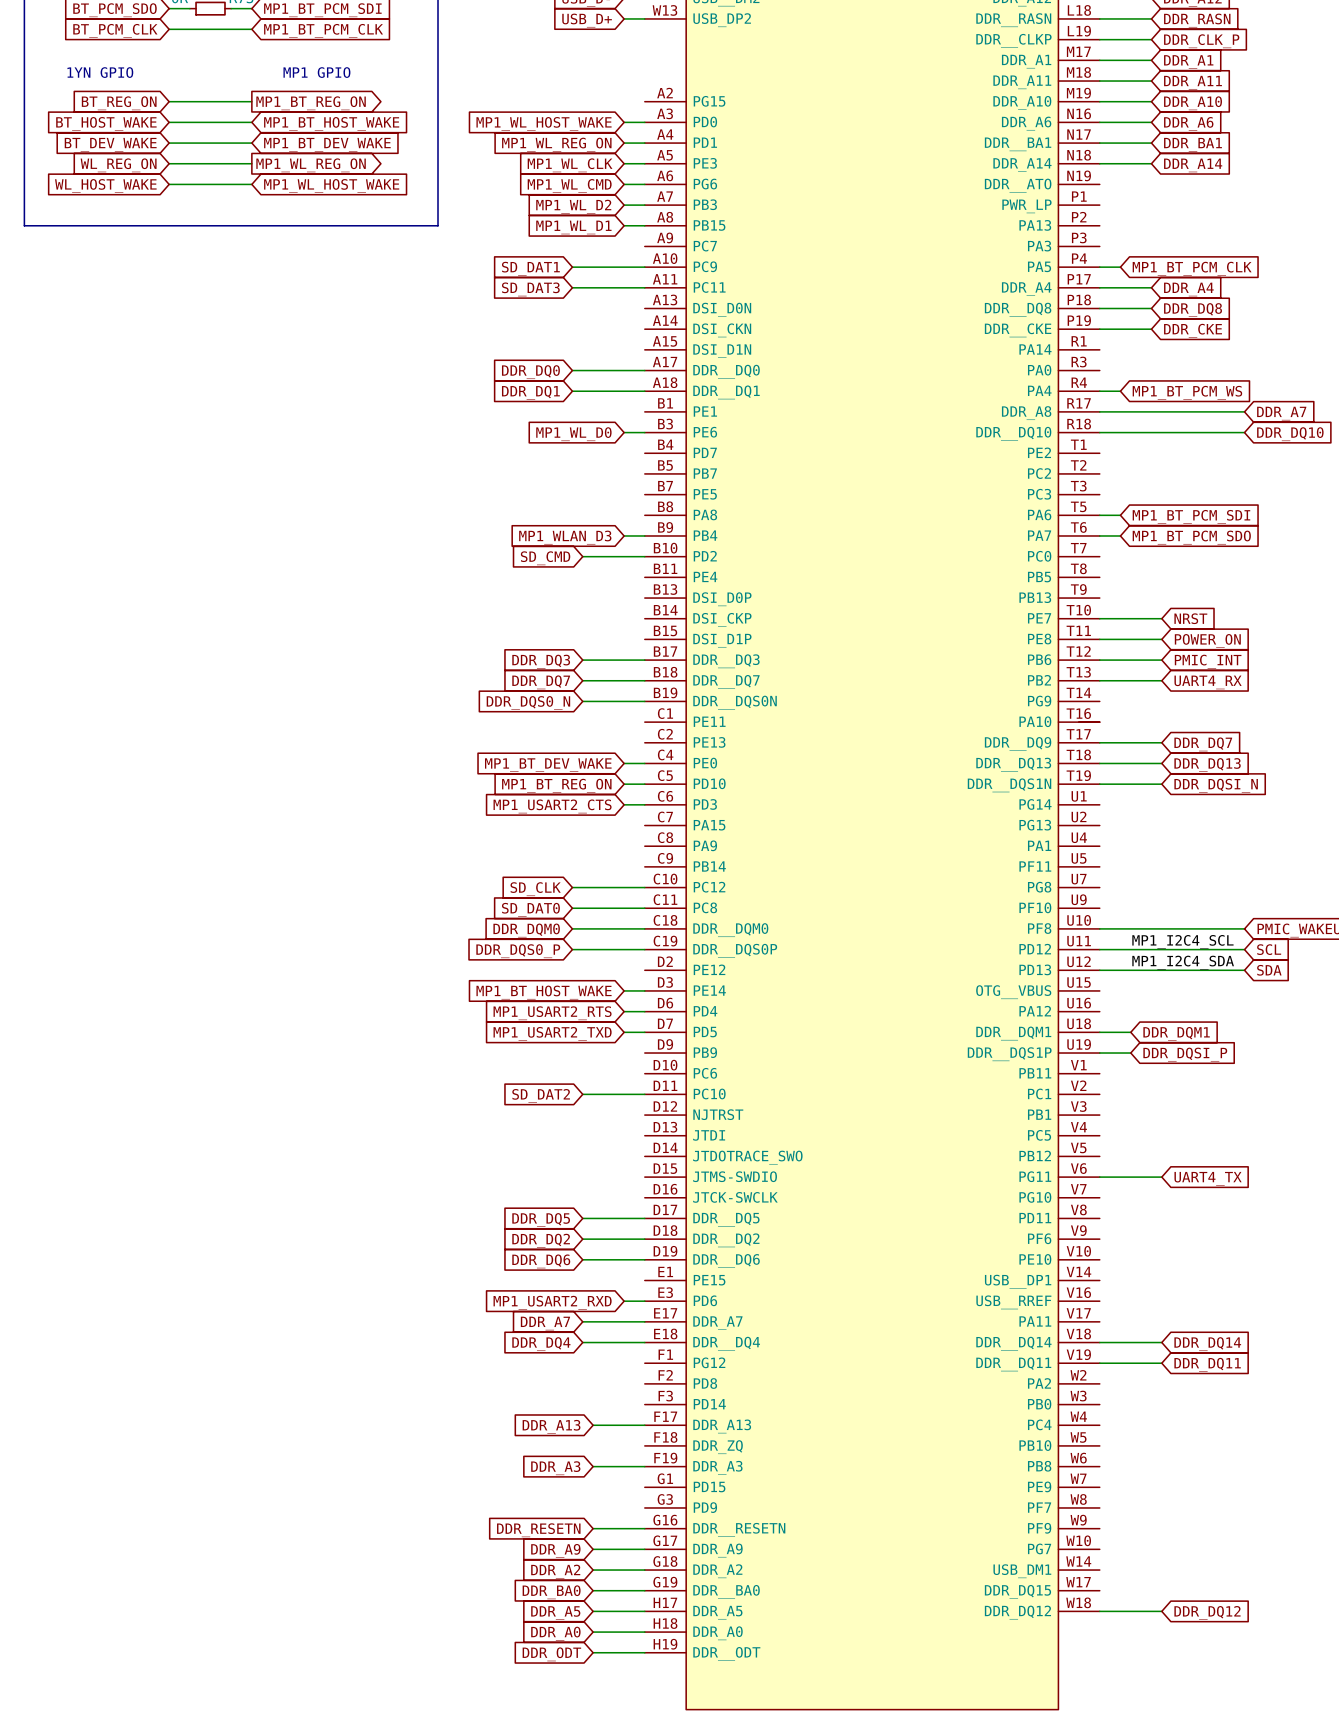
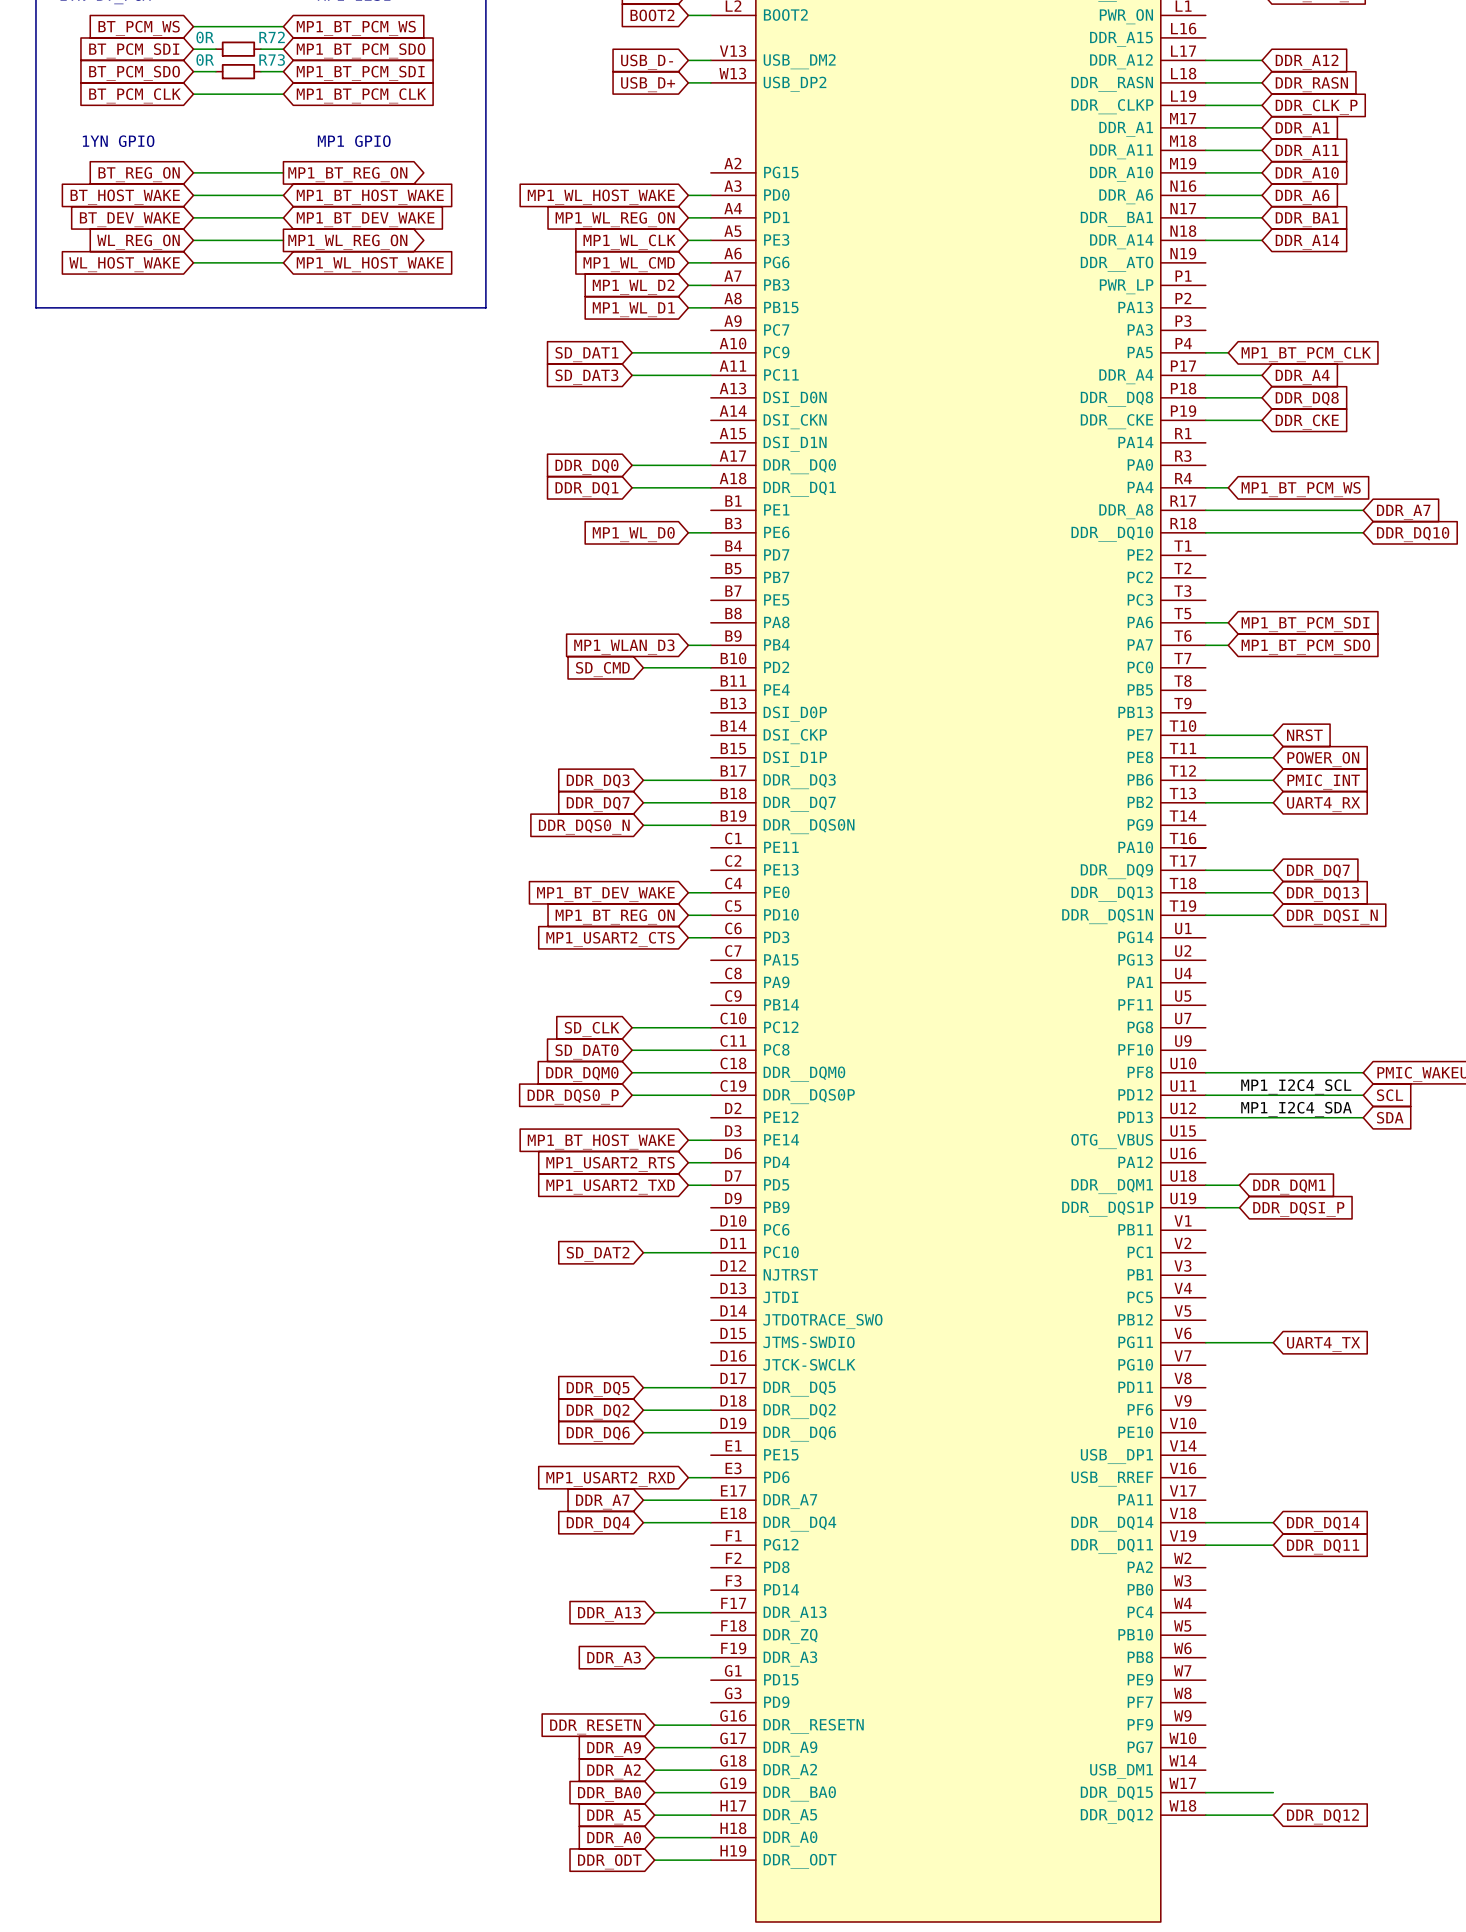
wire: none -> (1205, 1792) (1273, 1792)

